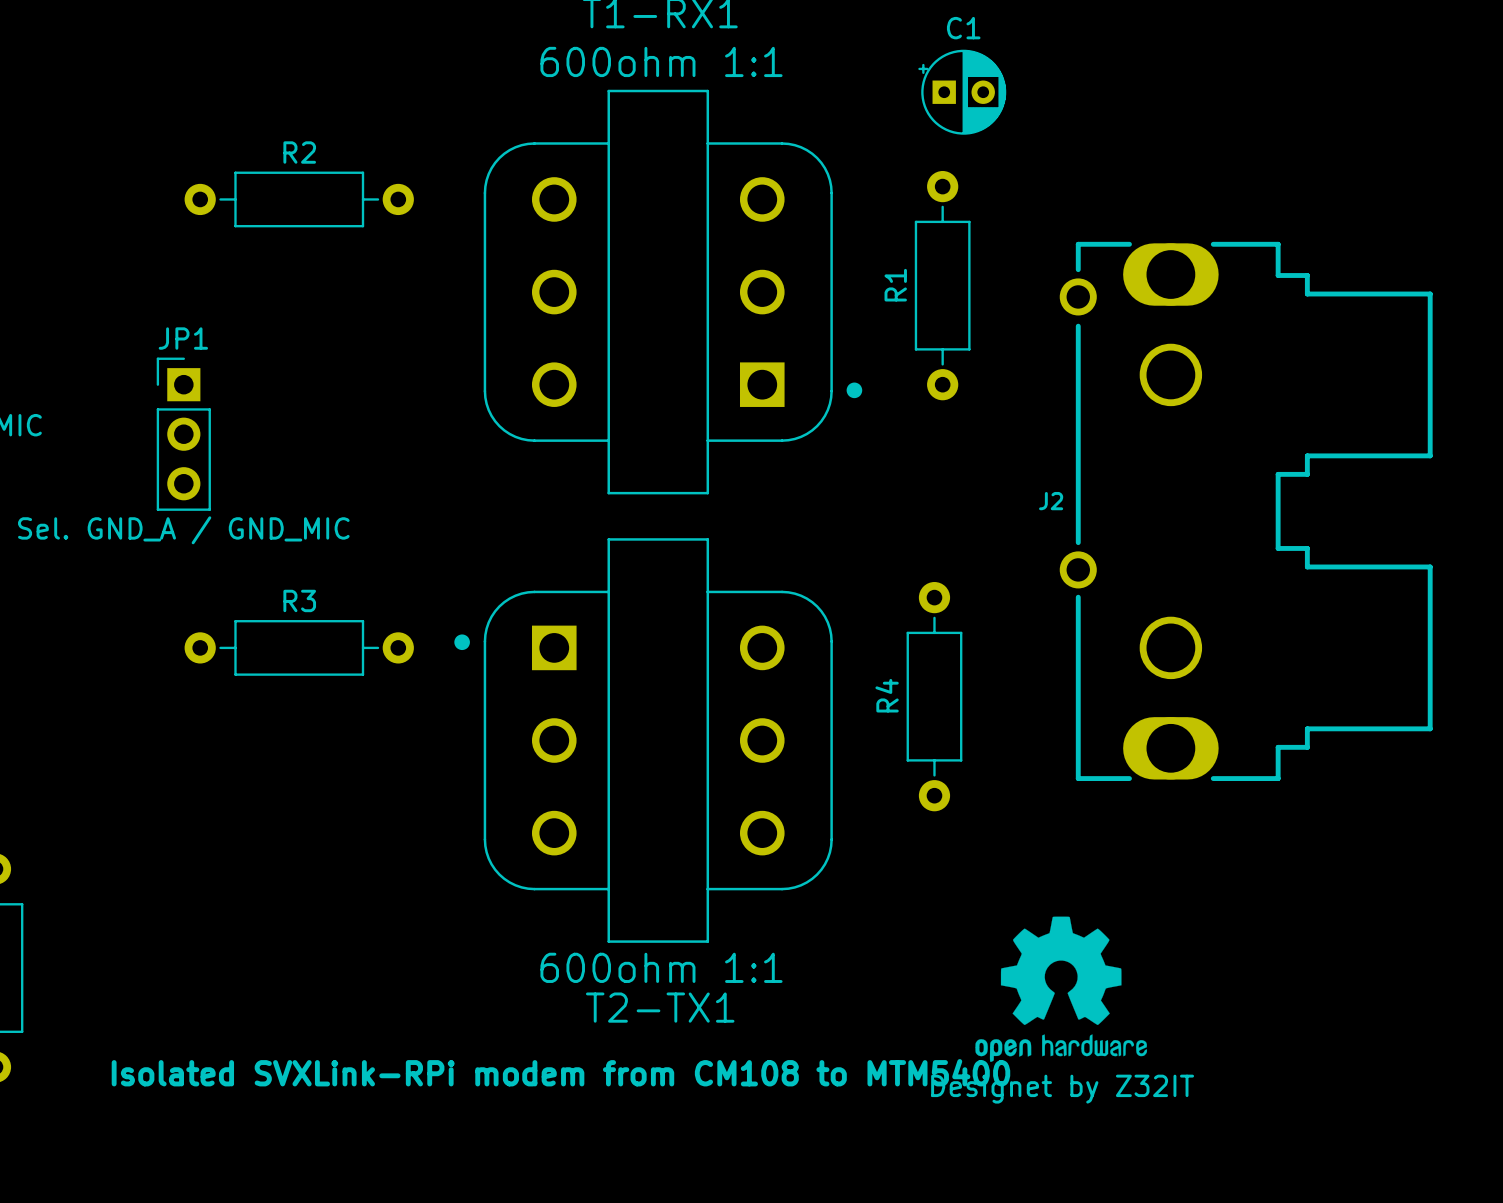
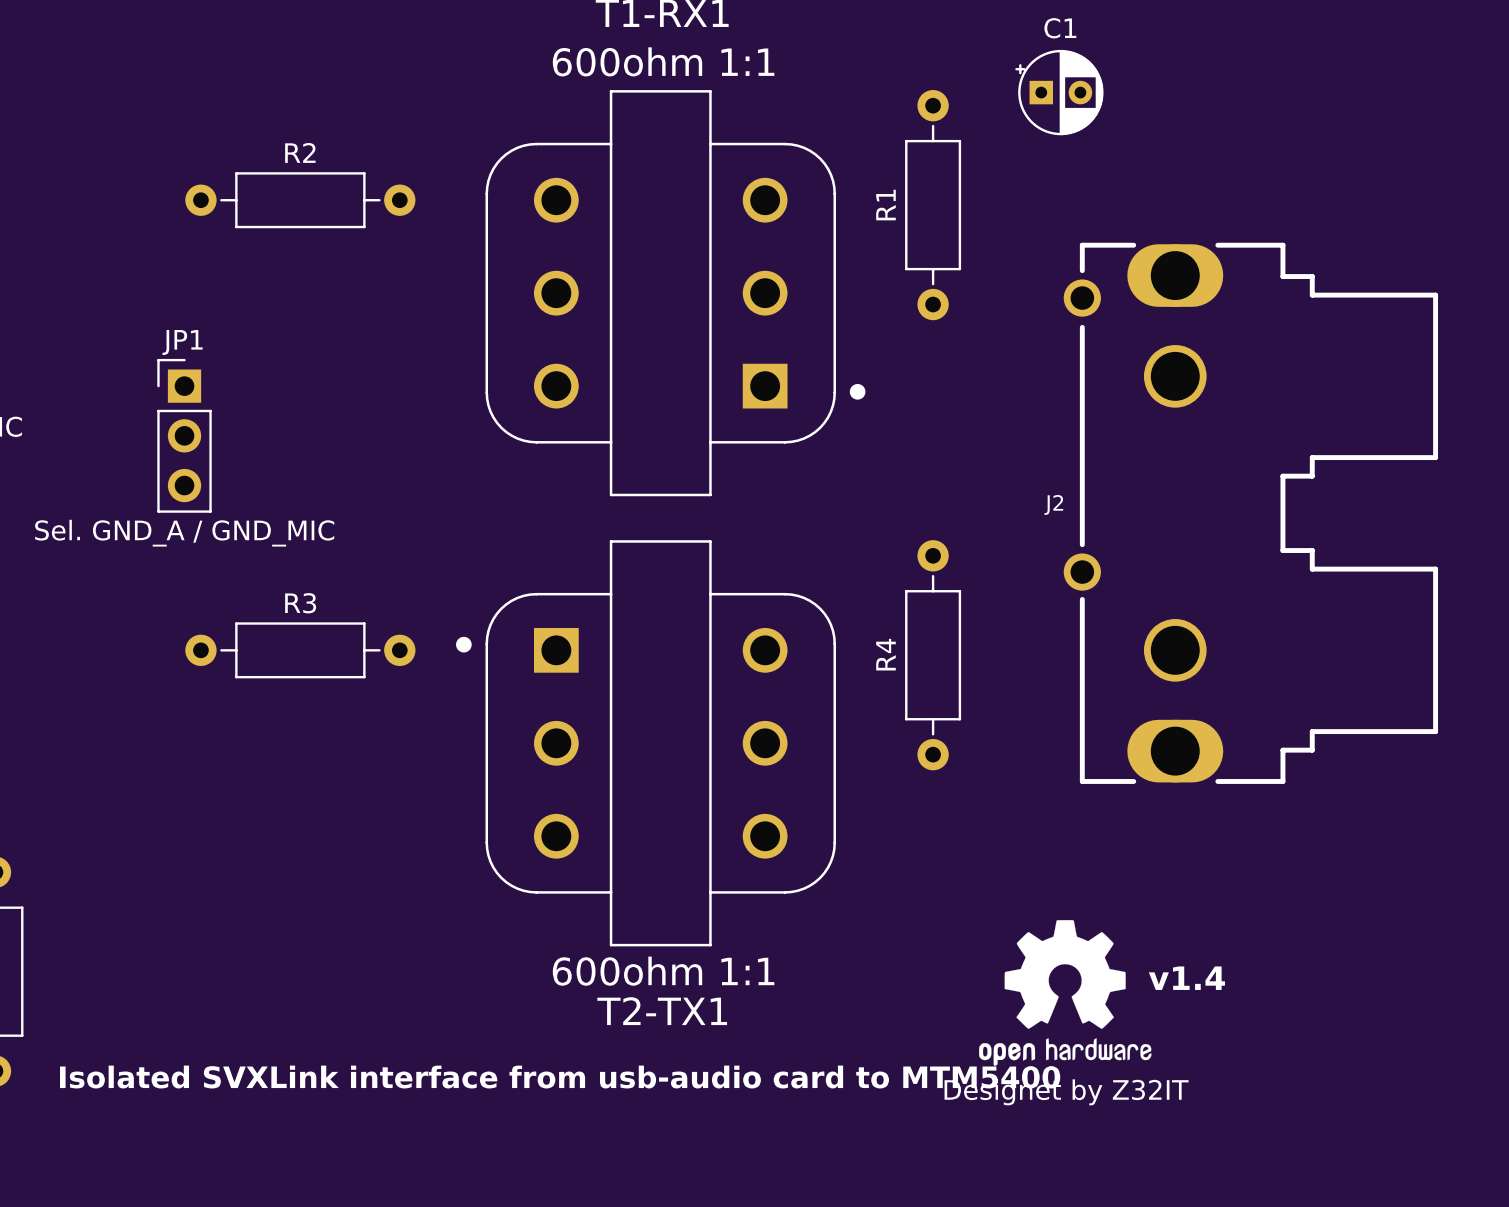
C1 position: (962, 92) -> (1059, 92)
R1 position: (942, 285) -> (933, 205)
R4 position: (934, 696) -> (933, 655)
text: none -> v1.4 (1186, 978)
text: Isolated SVXLink-RPi modem from CM108 to MTM5400 (560, 1072) -> Isolated SVXLink interface from usb-audio card to MTM5400 (560, 1077)

